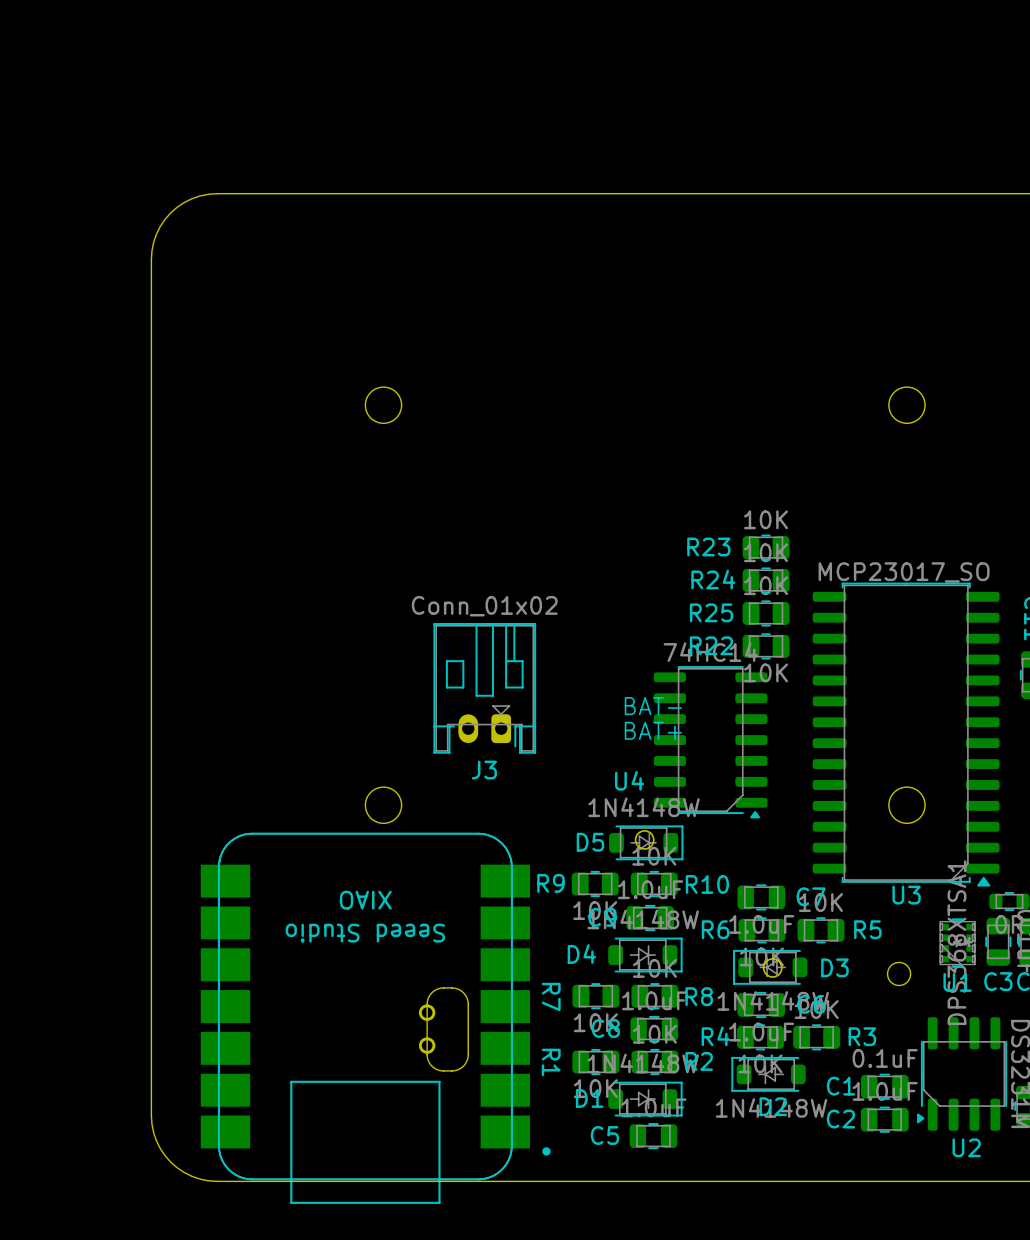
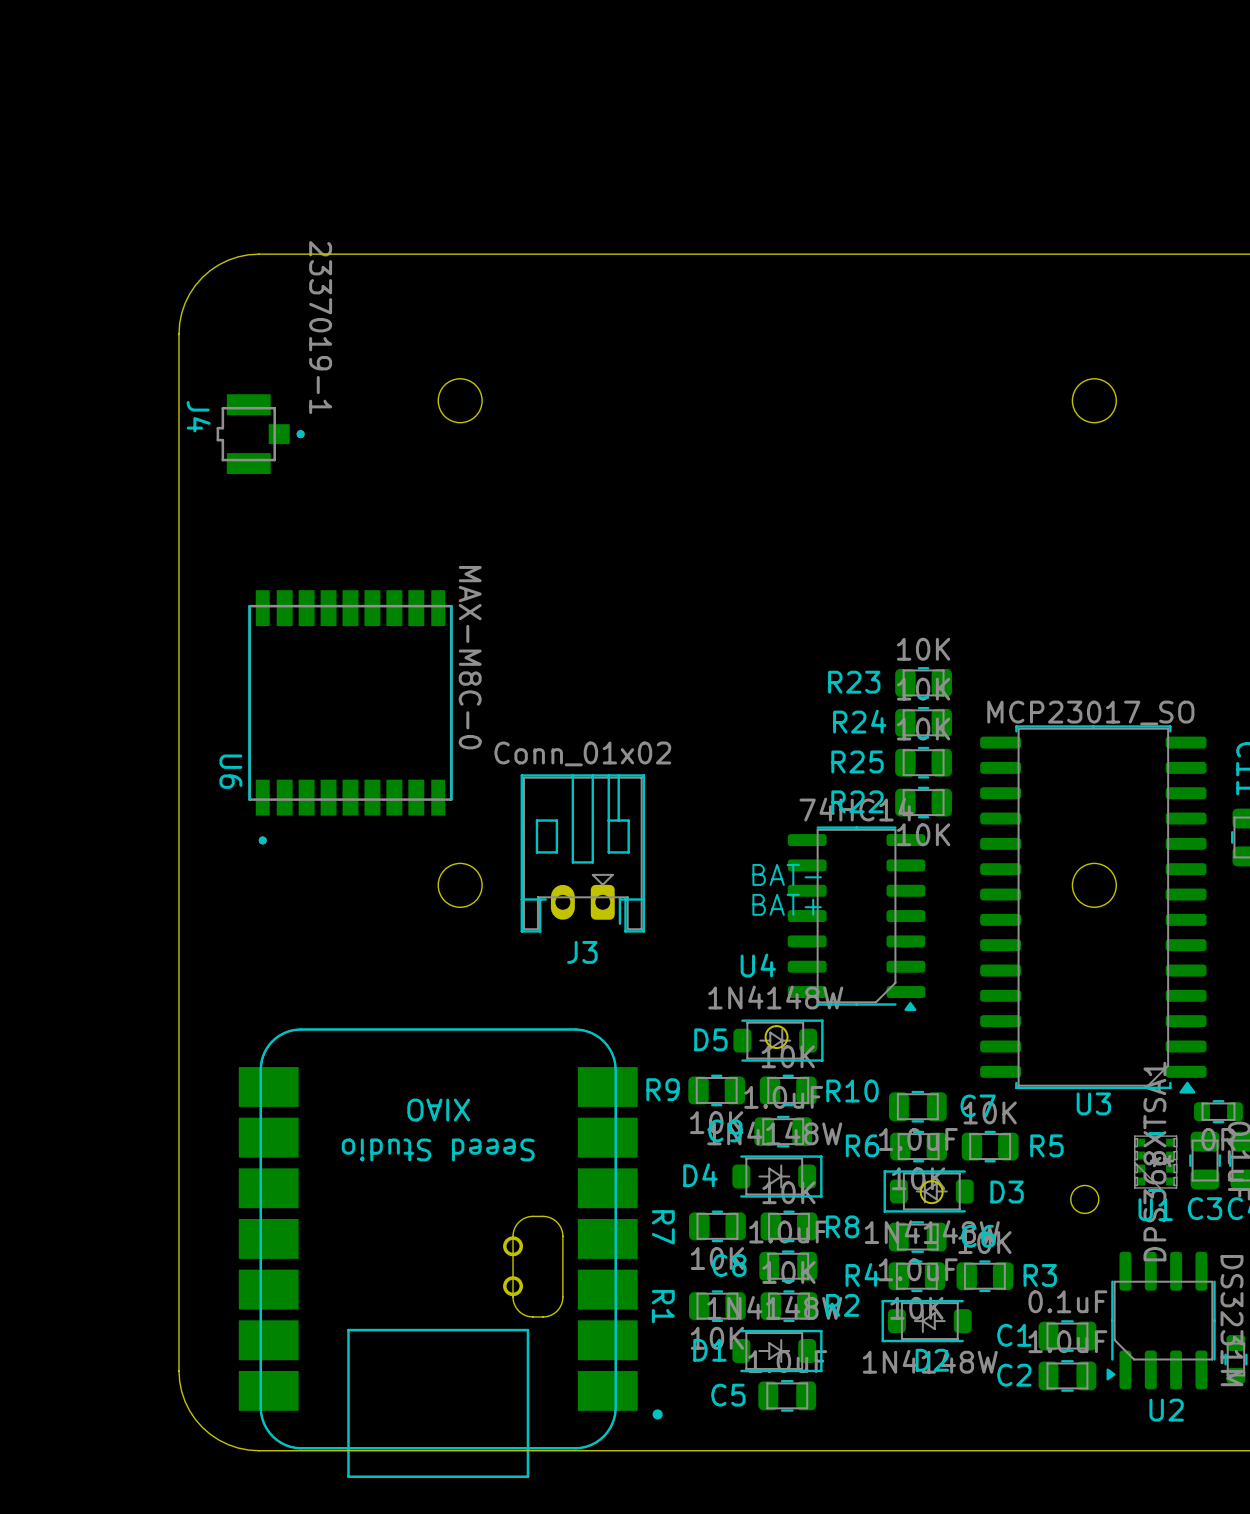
J4: none -> 2337019-1 (260, 434)
round board edge position: (383, 405) -> (460, 400)
round board edge position: (906, 405) -> (1094, 400)
U6: none -> MAX-M8C-0 (350, 717)
round board edge position: (383, 805) -> (460, 885)
round board edge position: (906, 805) -> (1094, 885)

